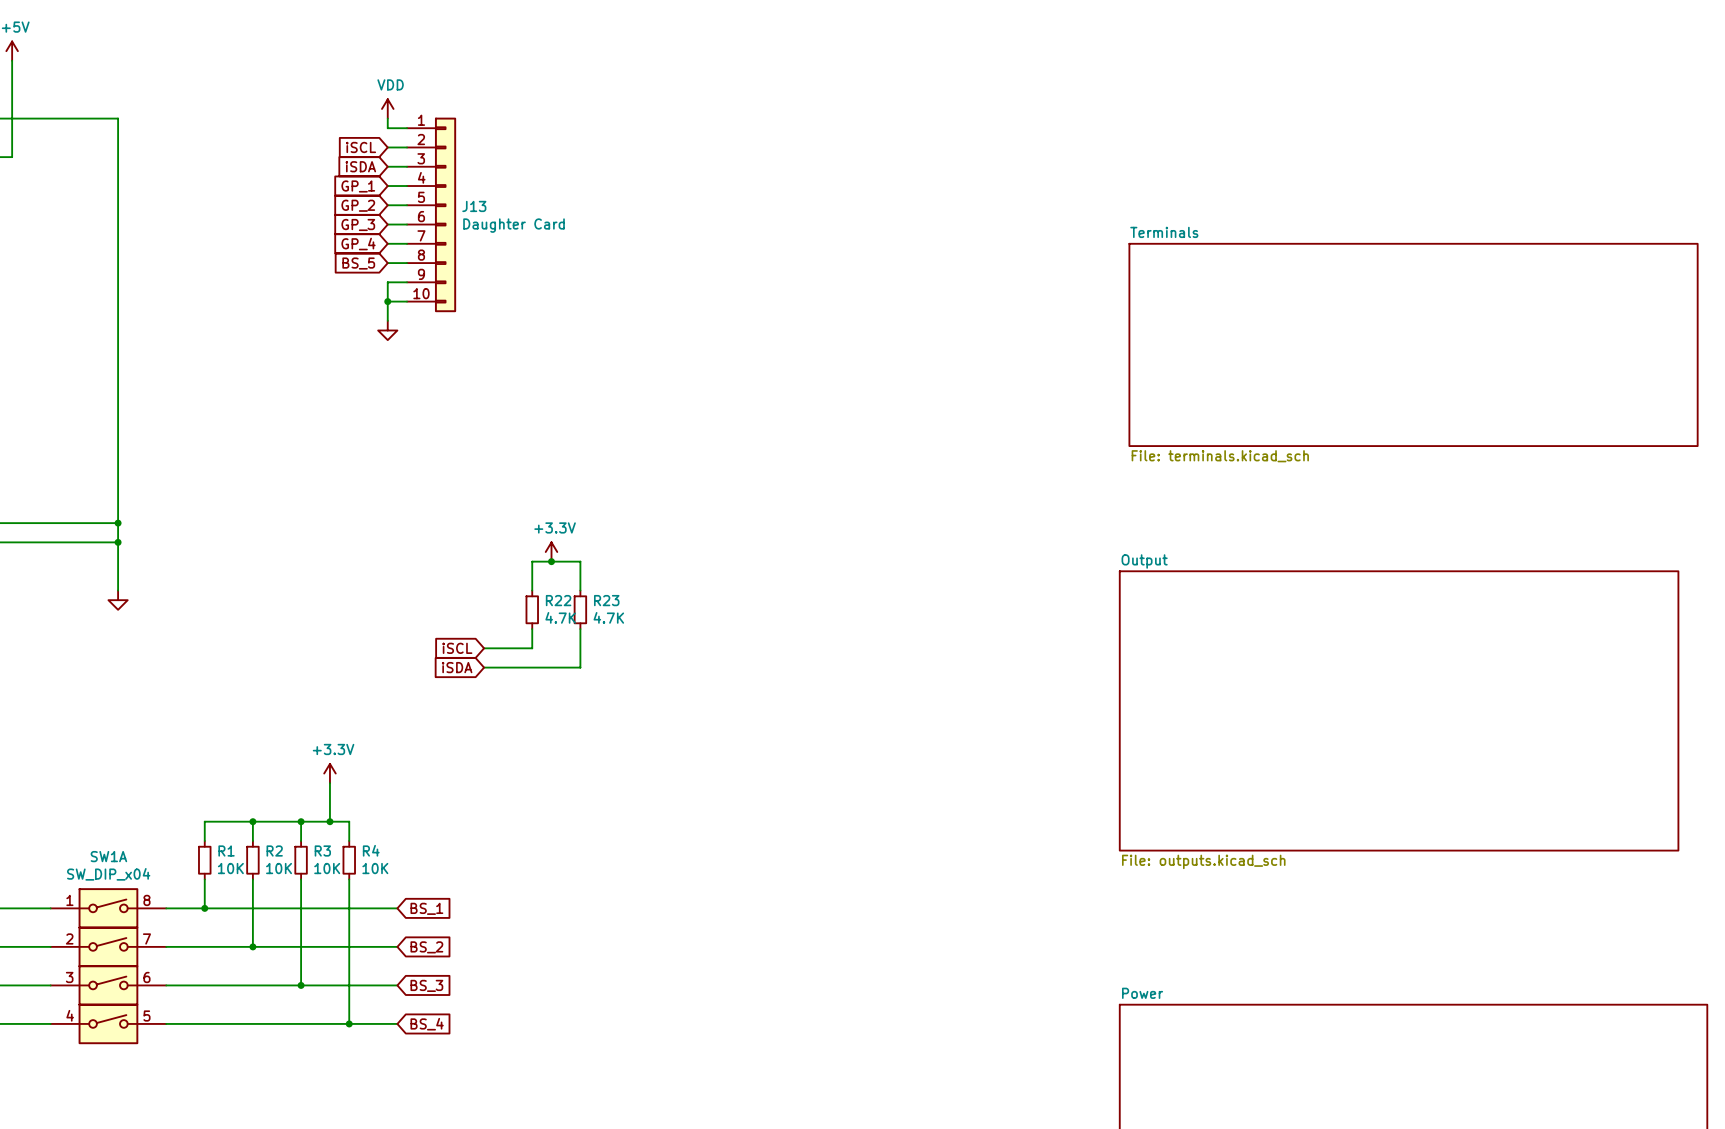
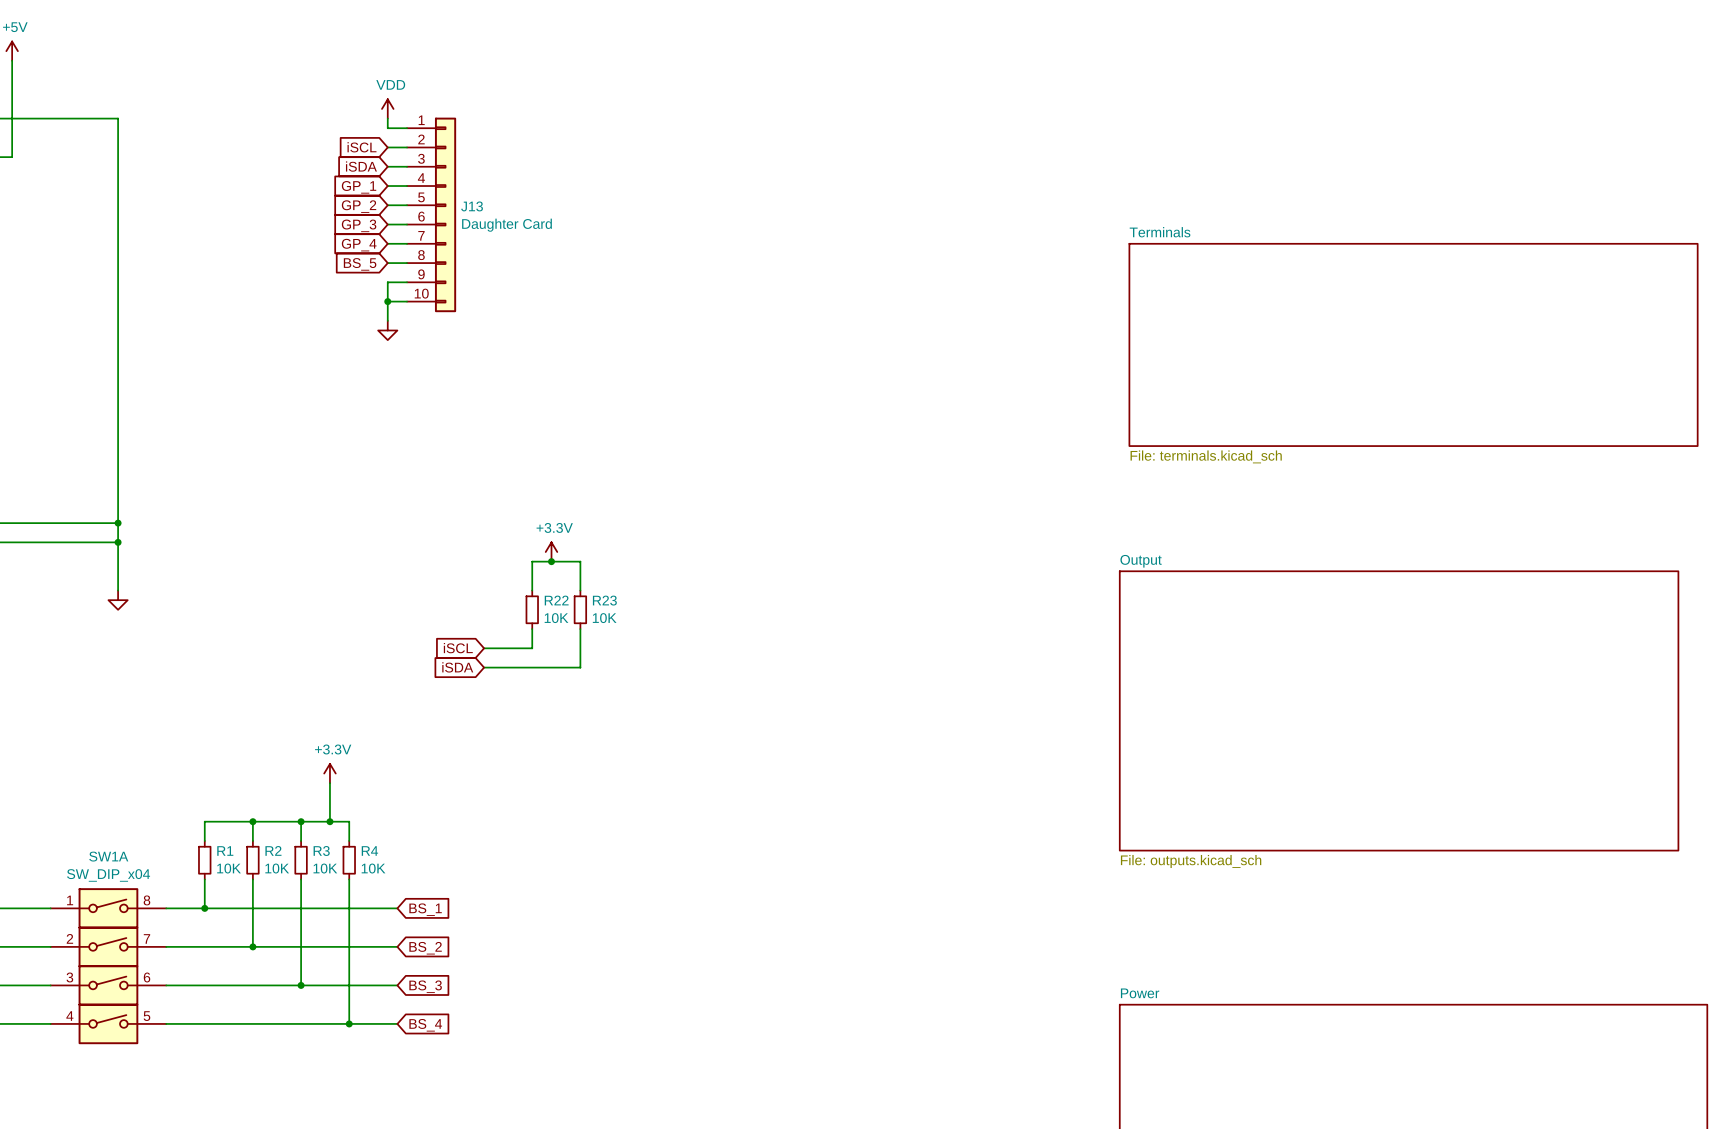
R22 value: 4.7K (560, 617) -> 10K (556, 618)
R23 value: 4.7K (608, 617) -> 10K (604, 618)

